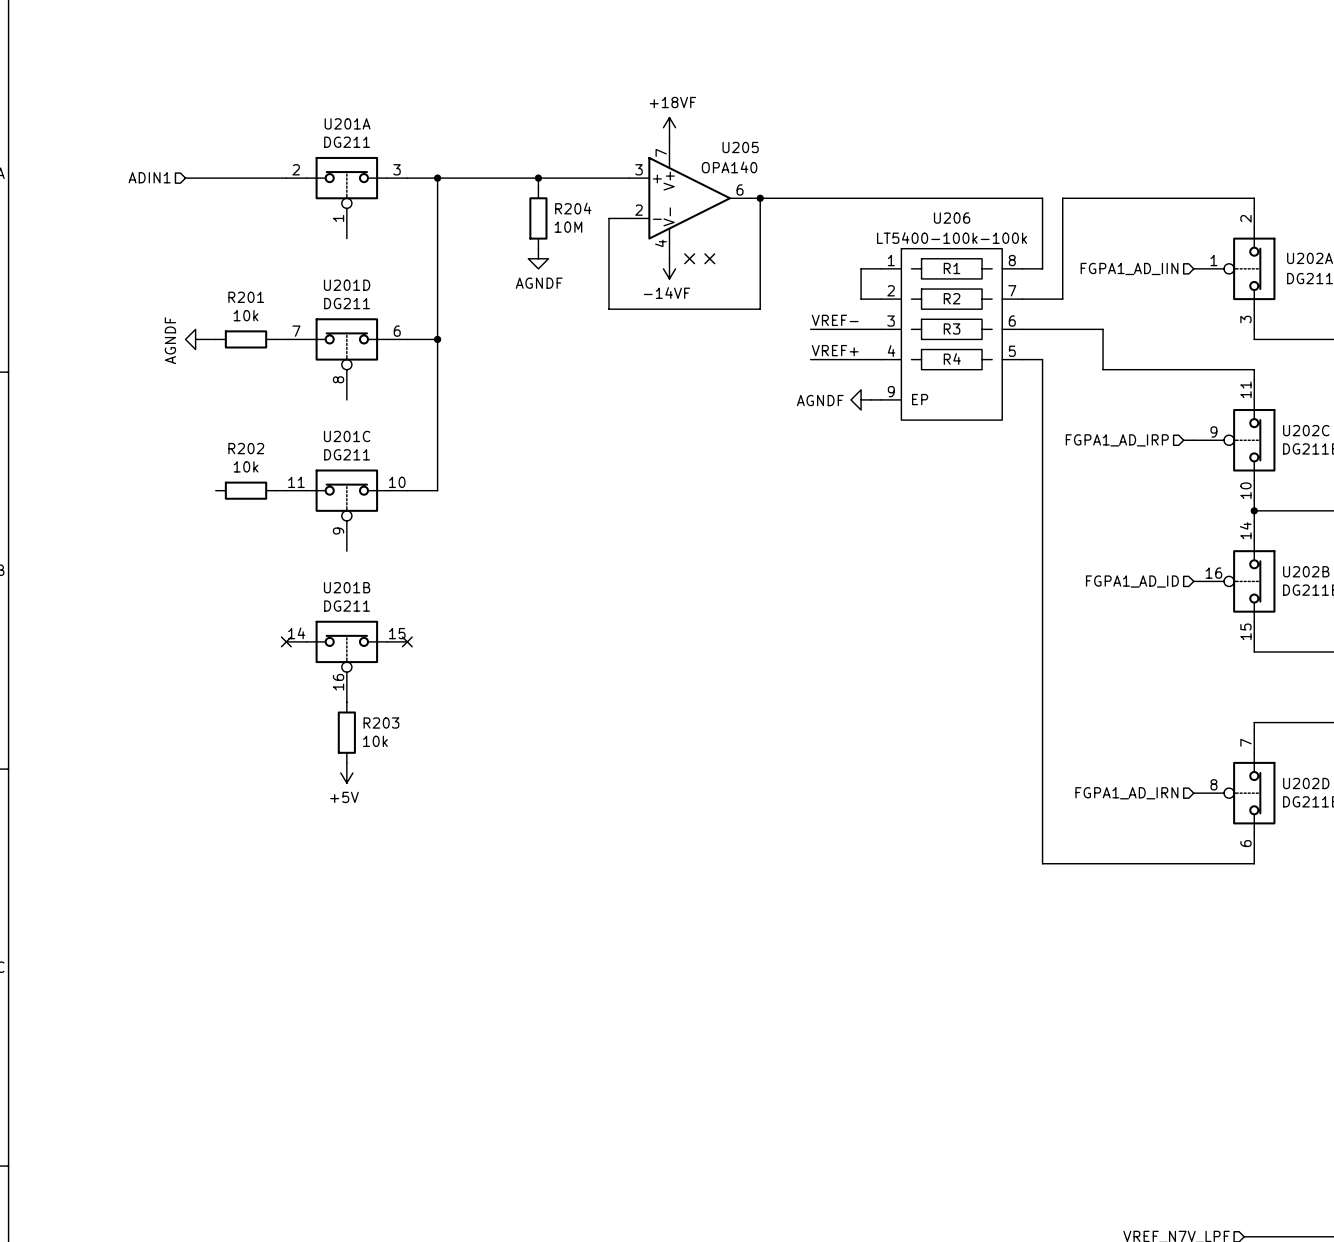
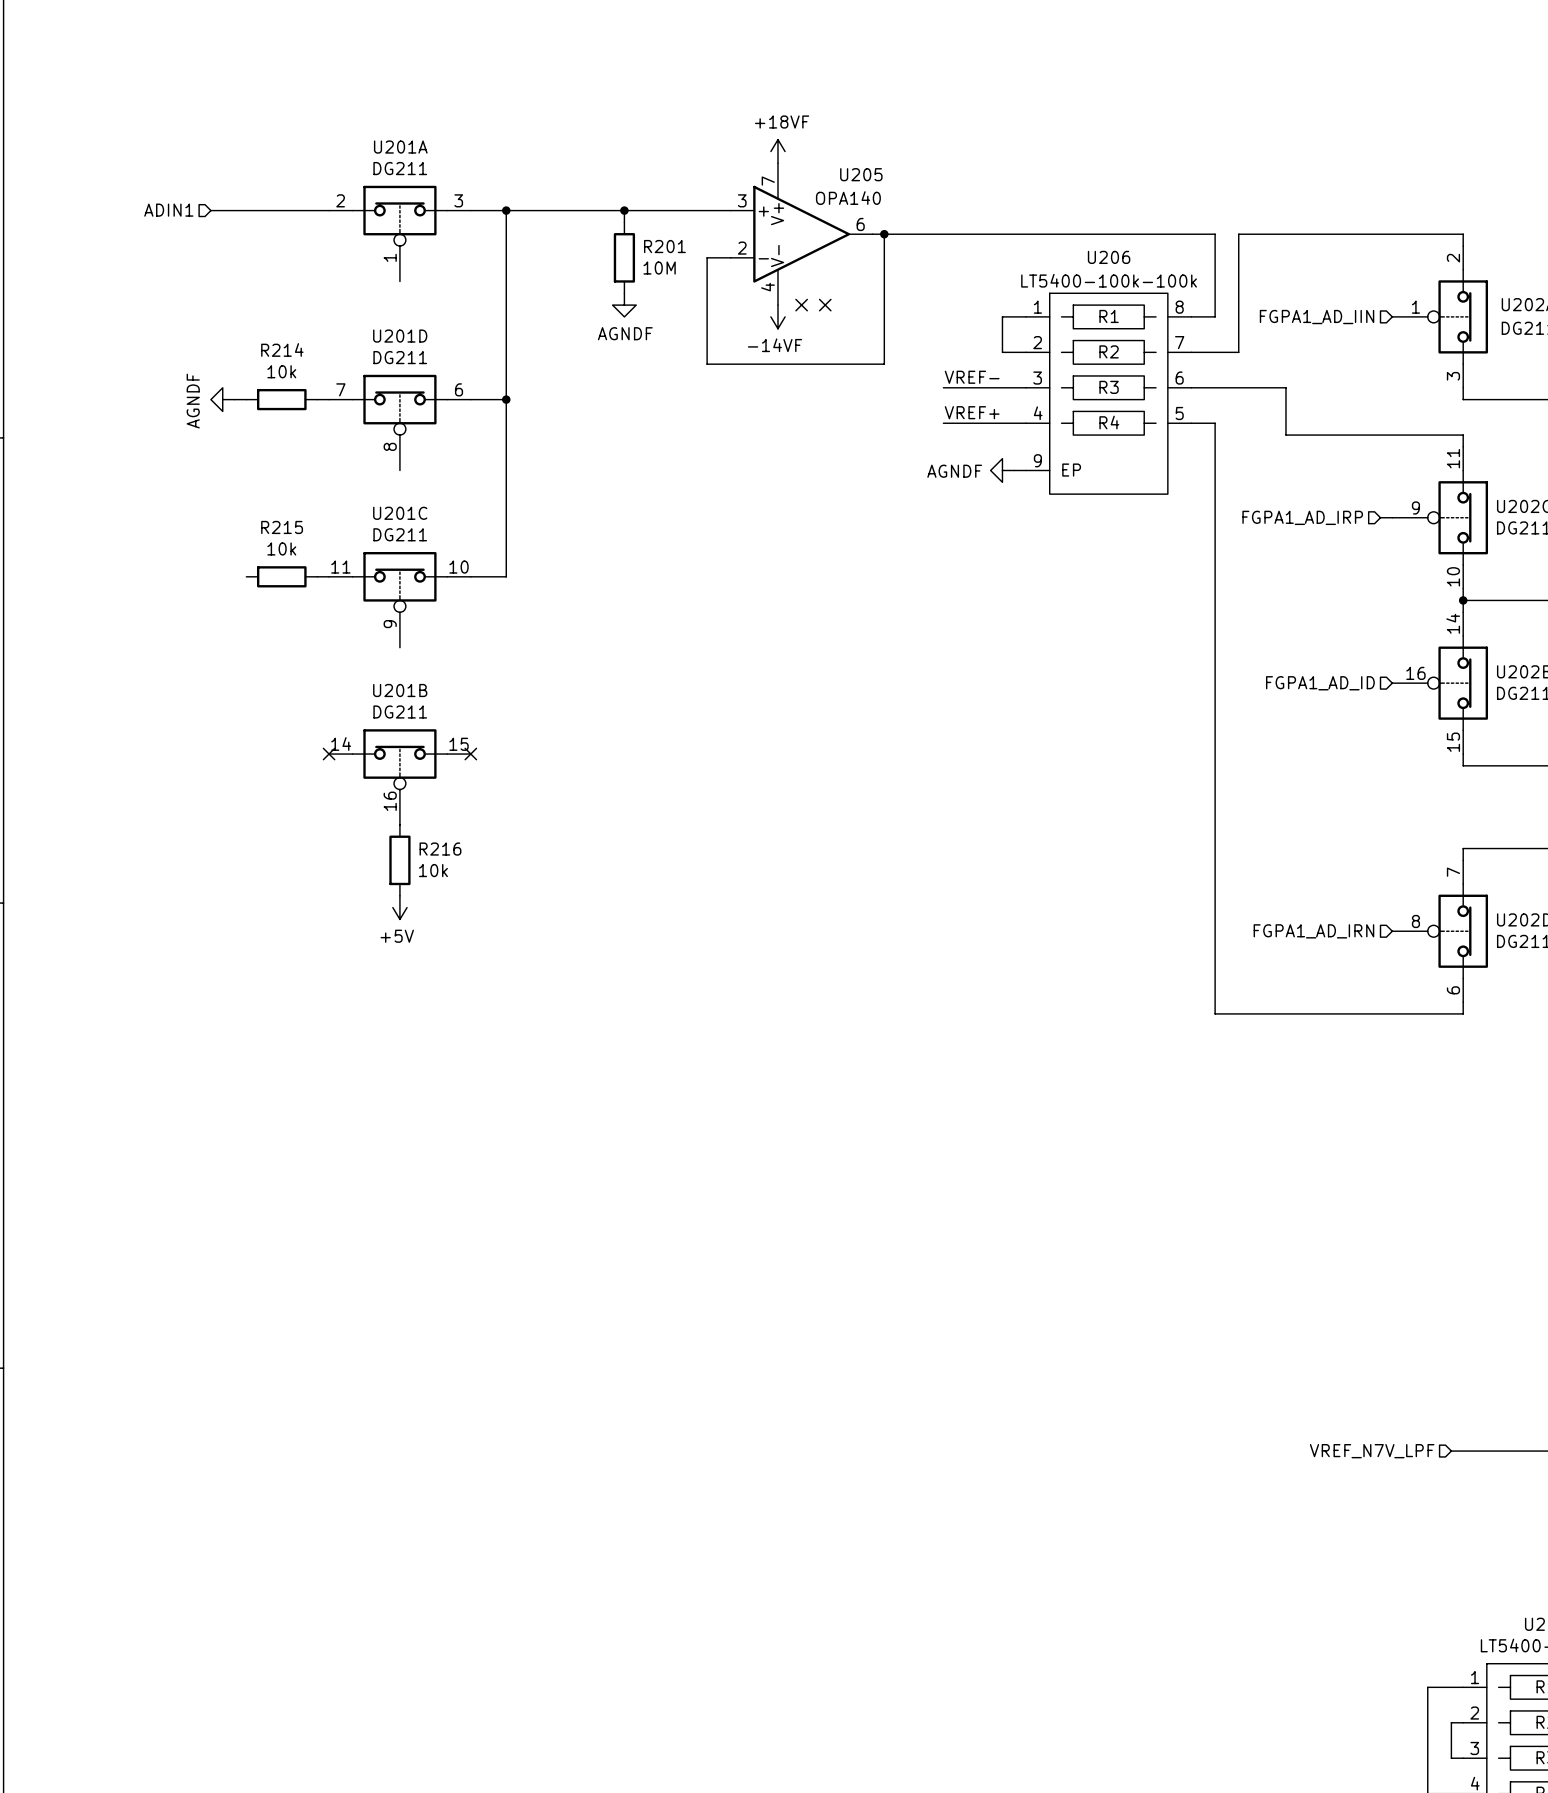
R204 name: R204 (573, 208) -> R201 (664, 246)
R201 name: R201 (246, 297) -> R214 (282, 349)
R202 name: R202 (246, 448) -> R215 (282, 527)
R203 name: R203 (381, 723) -> R216 (440, 849)

